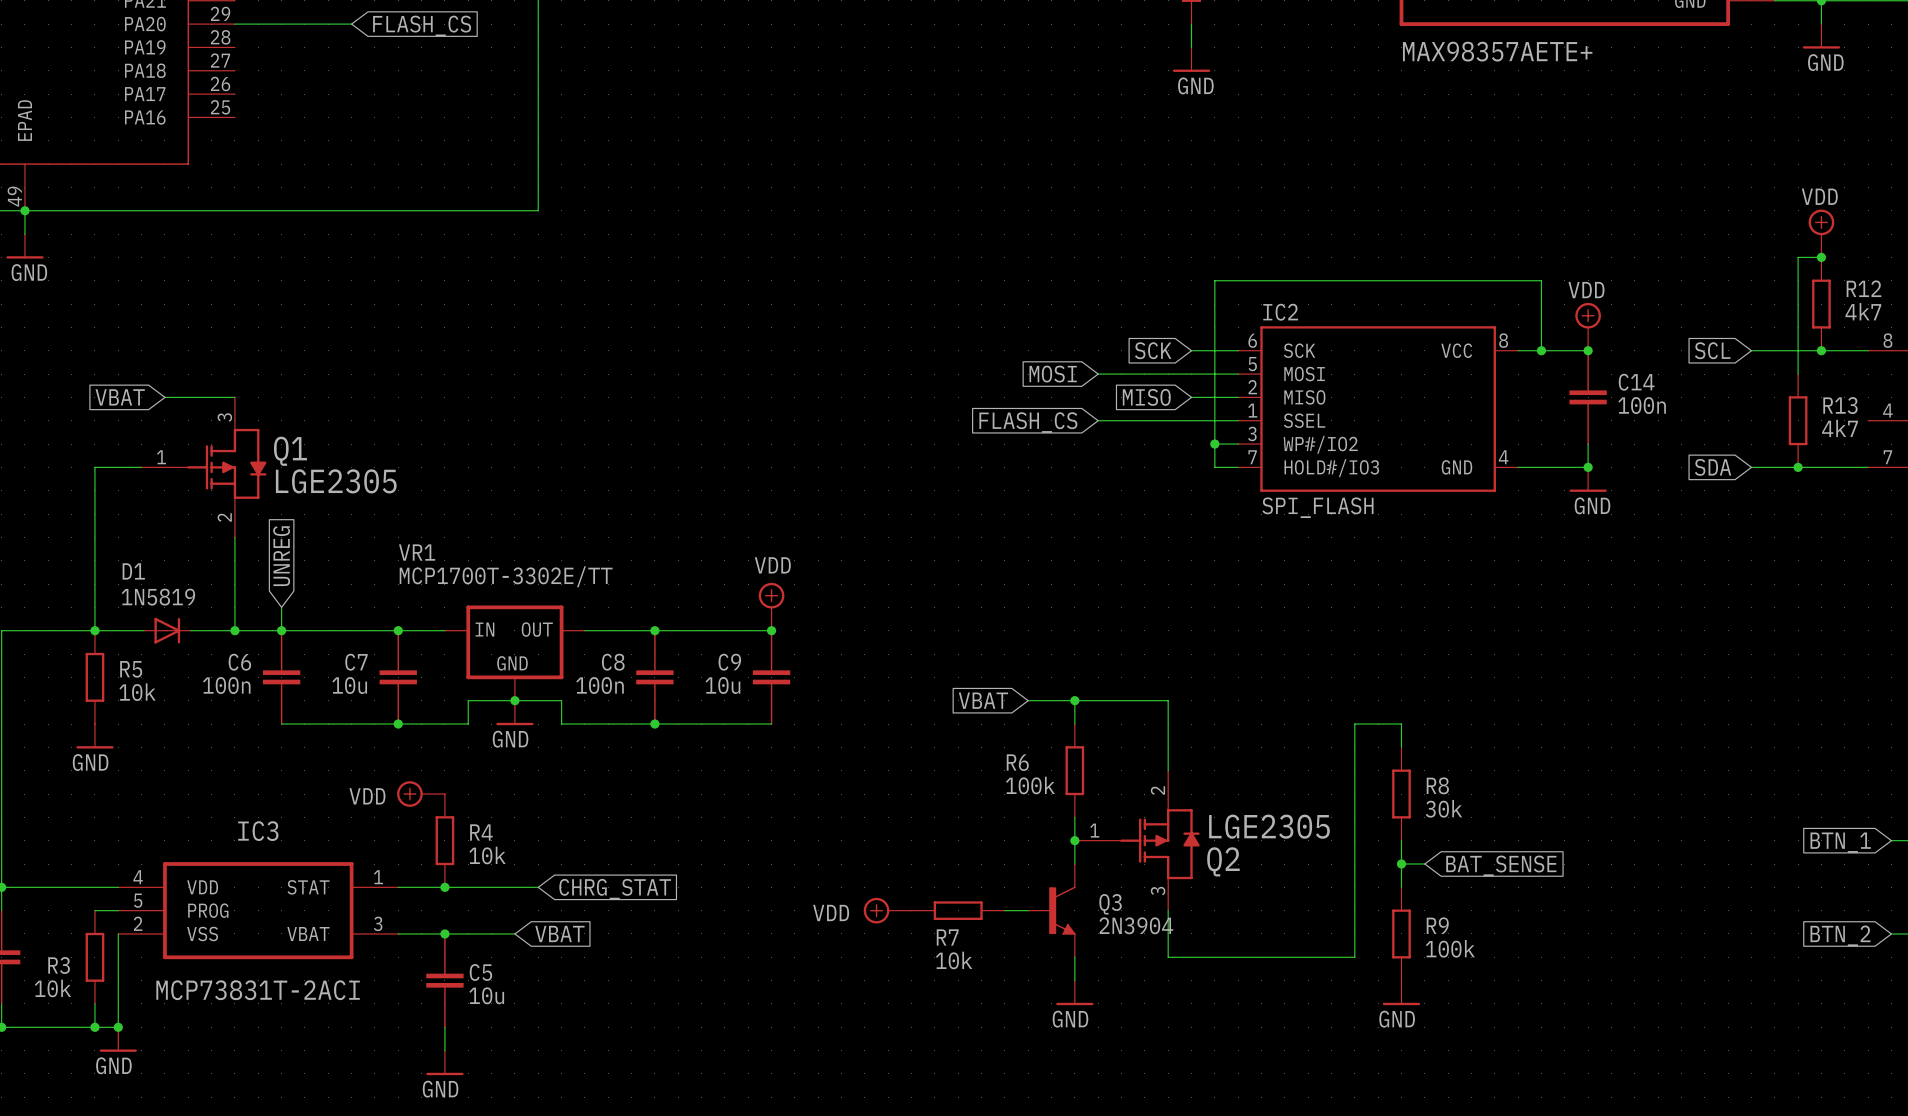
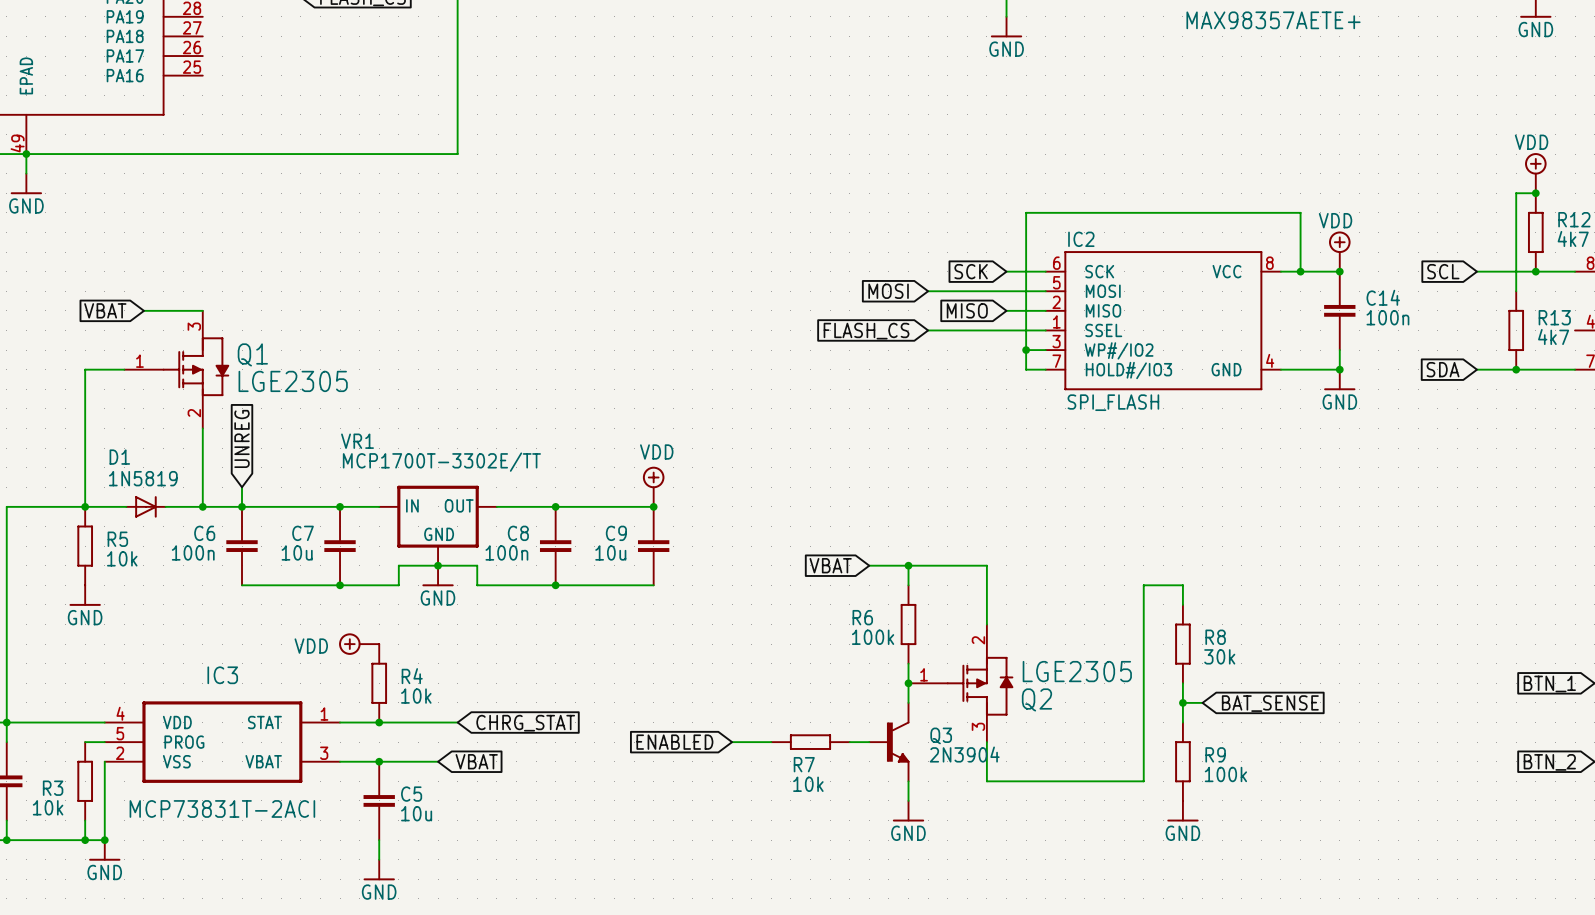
global label: none -> ENABLED (674, 742)
power symbol: VDD (887, 910) -> none

